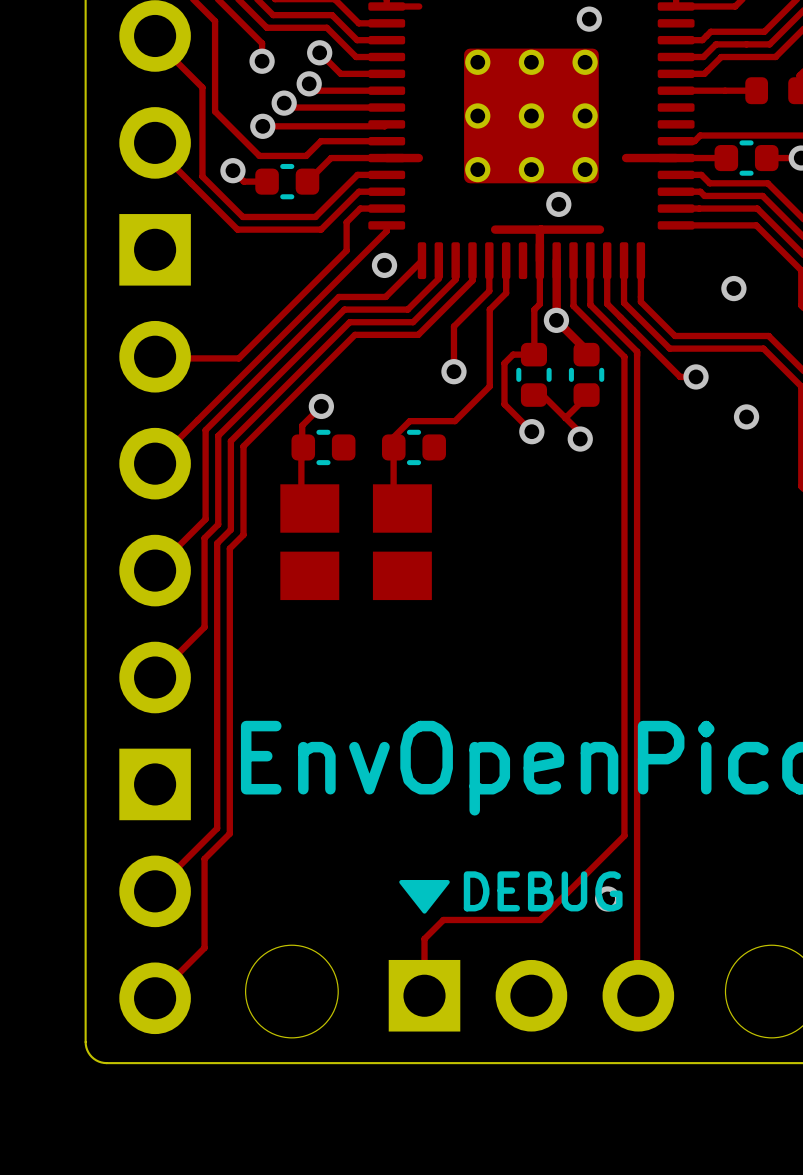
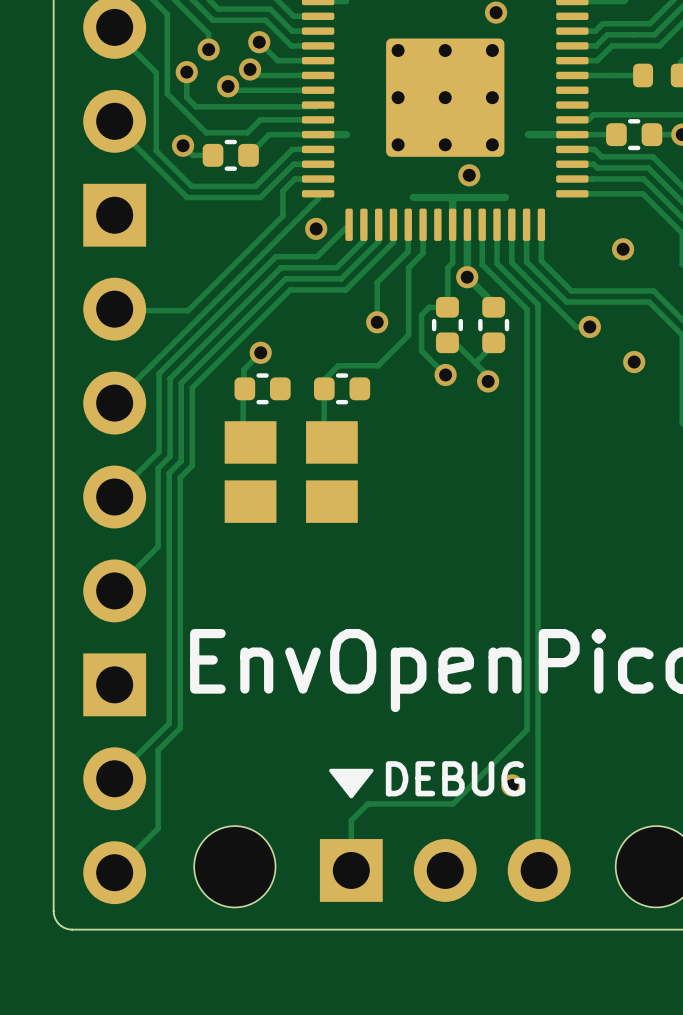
track: none -> (186, 72) (186, 97) (196, 106) (209, 106)
via position: (262, 126) -> (186, 72)

